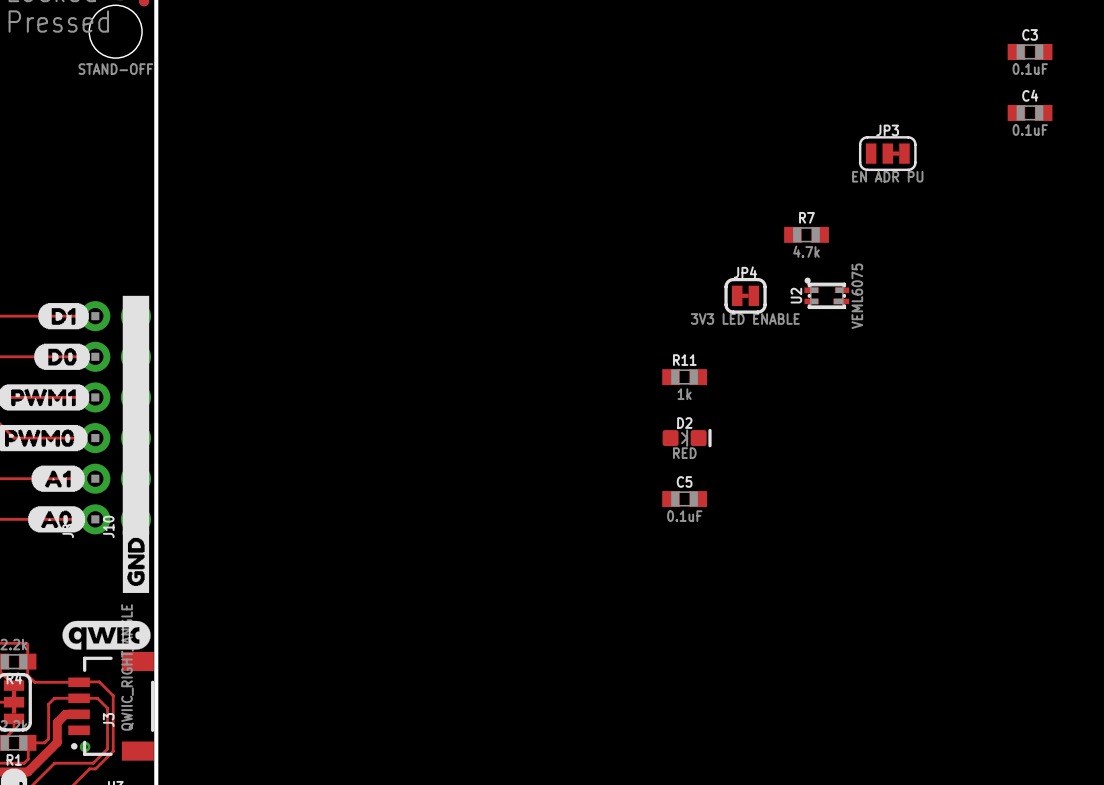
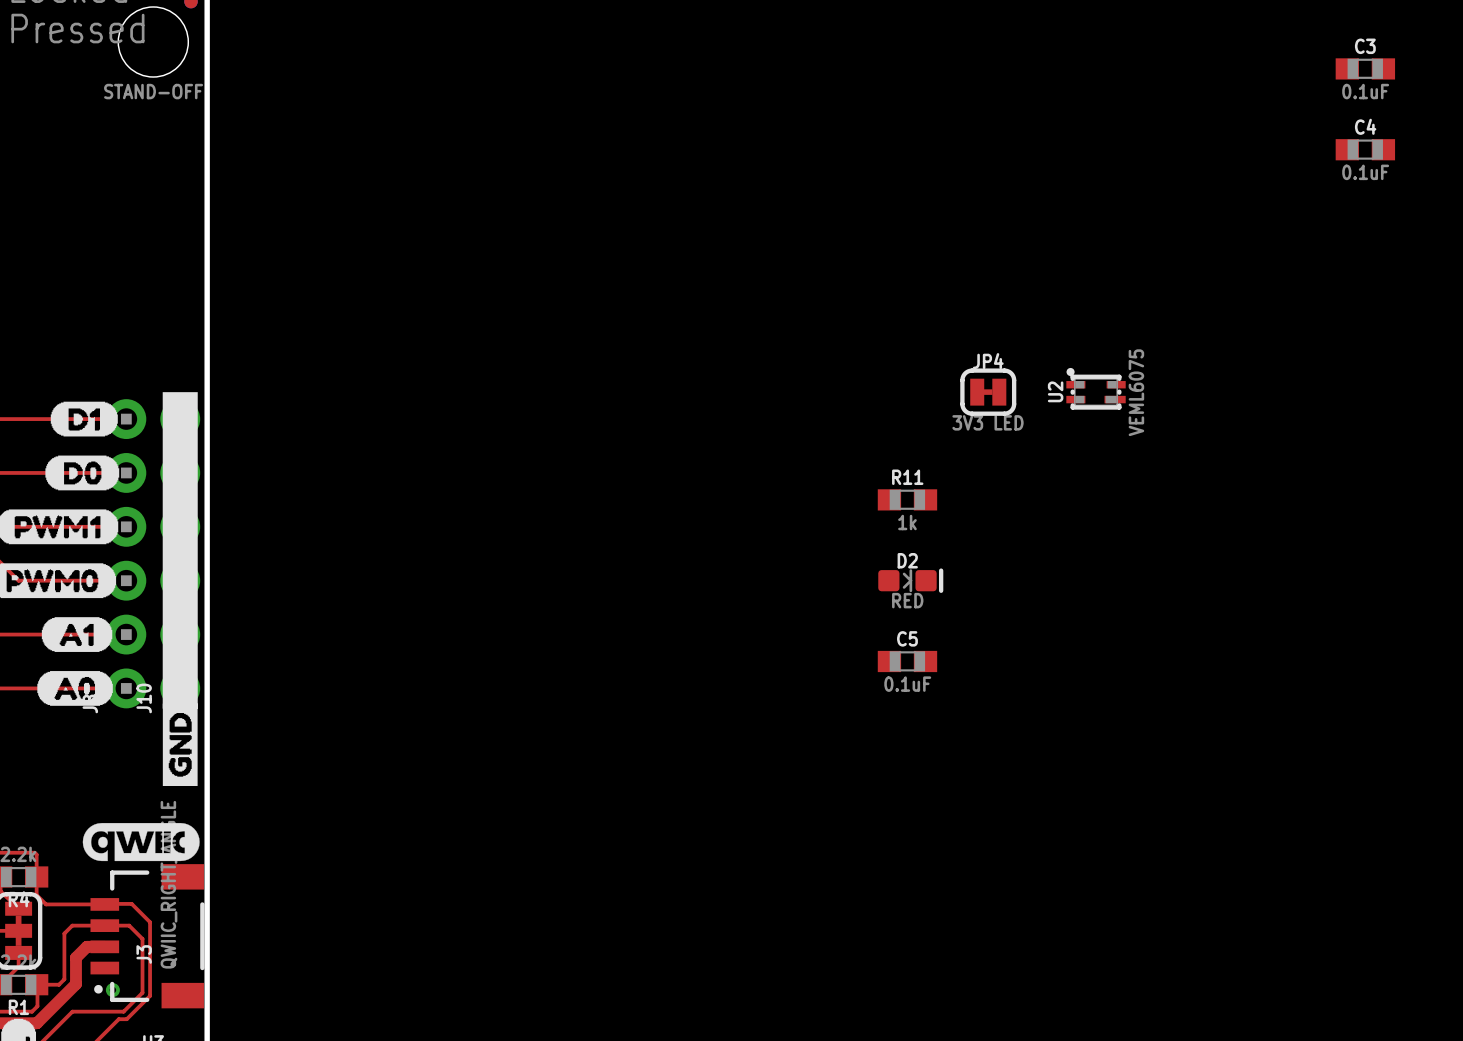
JP3: EN ADR PU (887, 153) -> none
R7: 4.7k (806, 234) -> none
JP4 value: 3V3 LED ENABLE (745, 319) -> 3V3 LED (988, 422)

